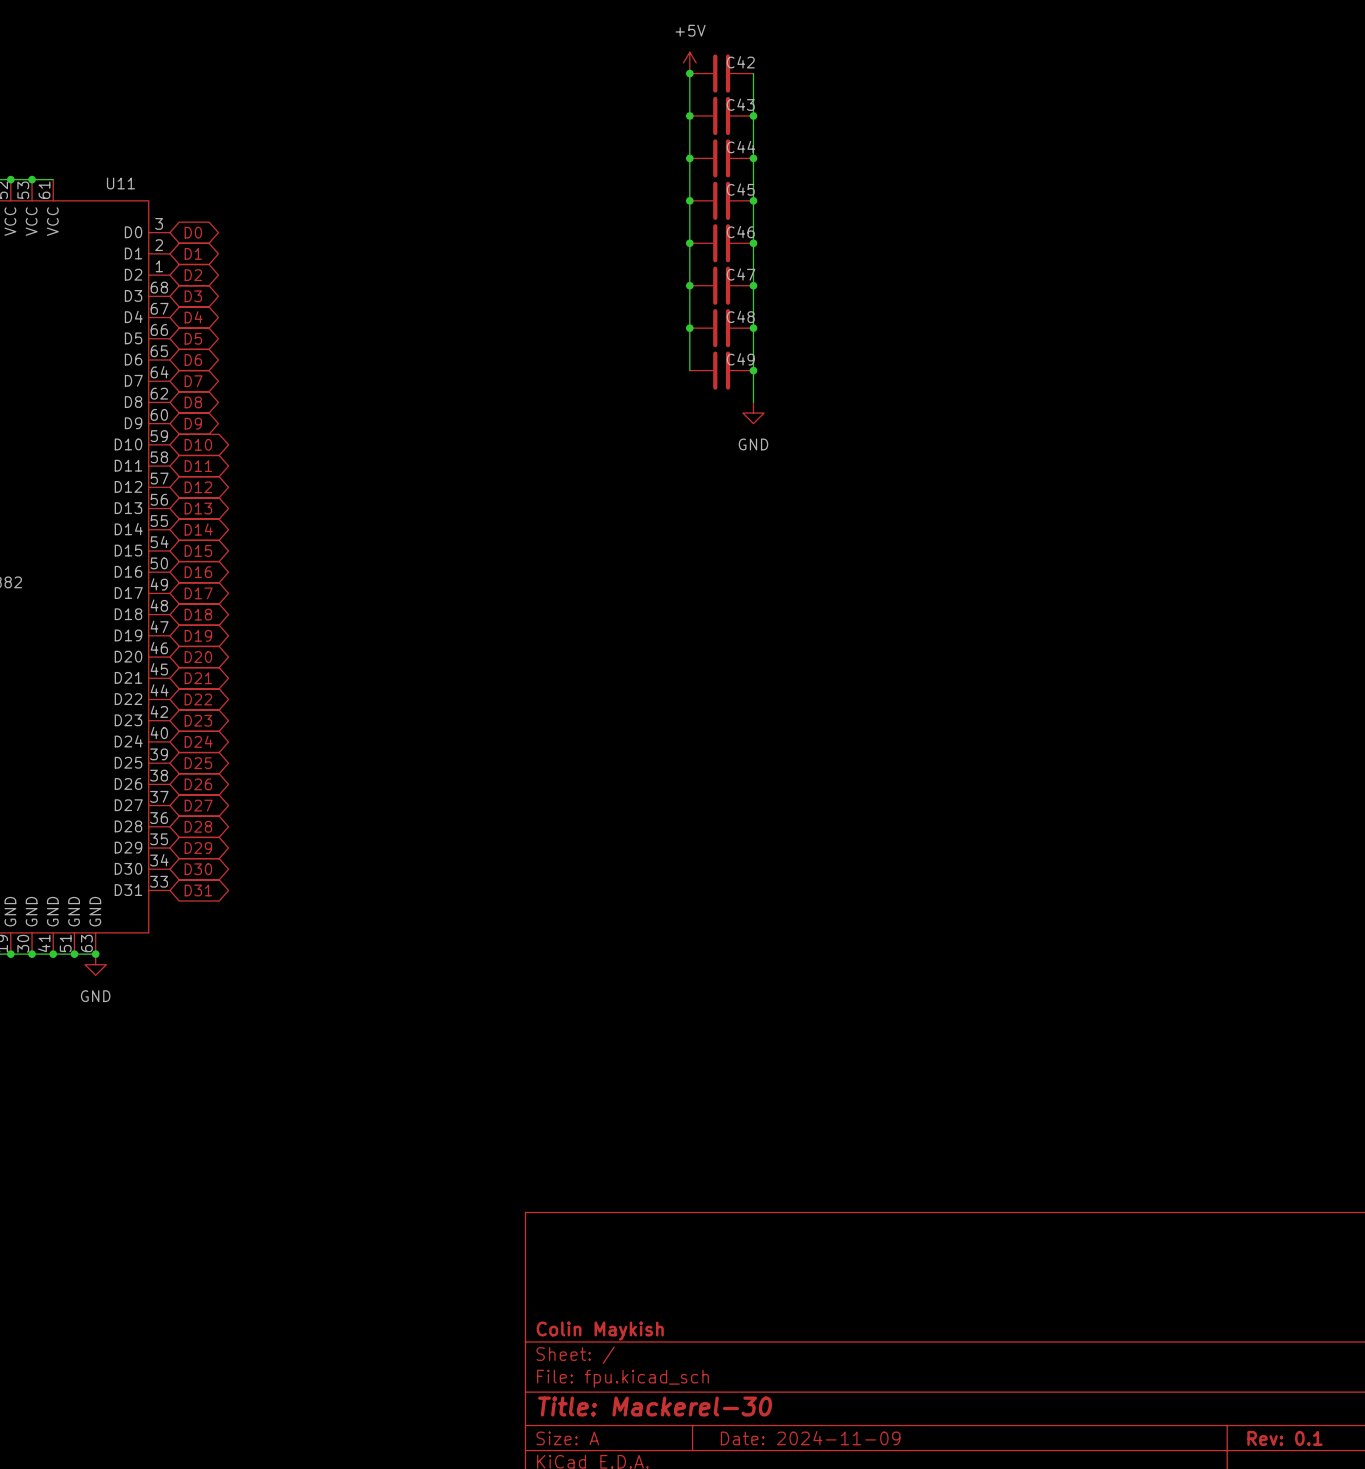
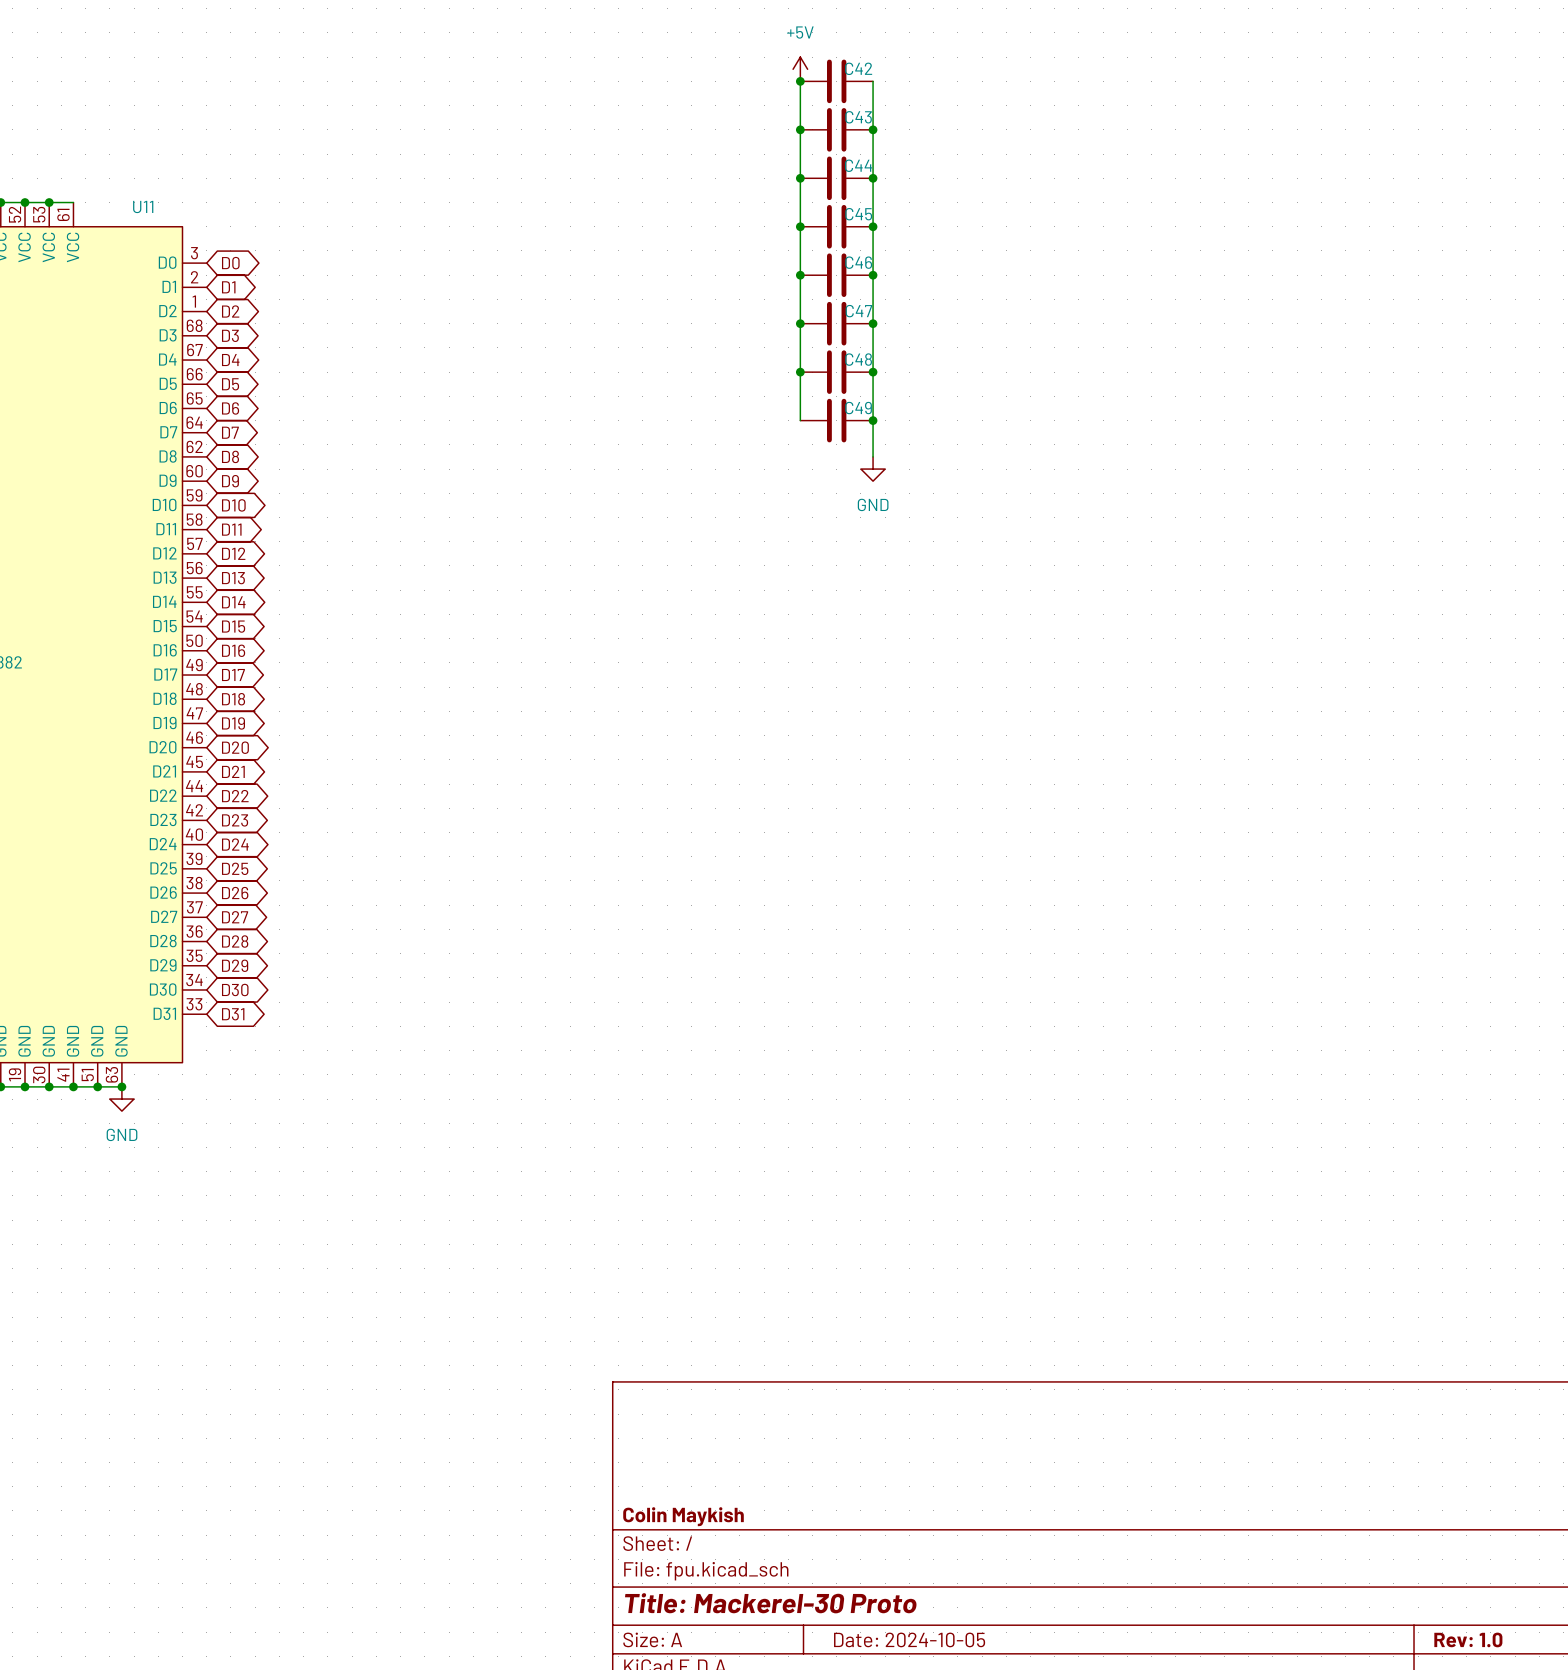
title block: Title: Mackerel-30 (655, 1406) -> Title: Mackerel-30 Proto (770, 1603)
title block: Date: 2024-11-09 (810, 1438) -> Date: 2024-10-05 (909, 1639)
title block: Rev: 0.1 (1284, 1438) -> Rev: 1.0 (1468, 1639)

